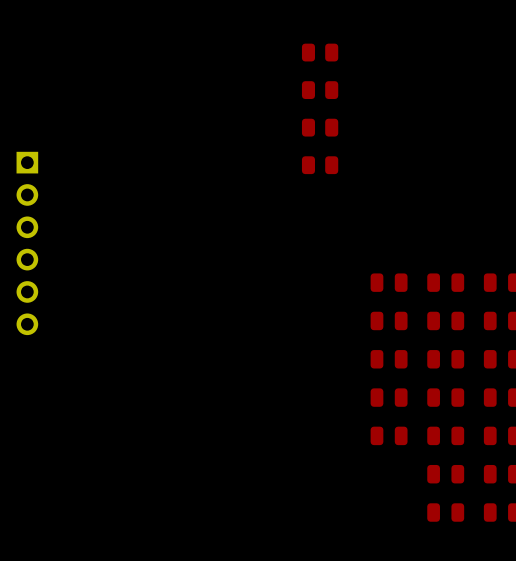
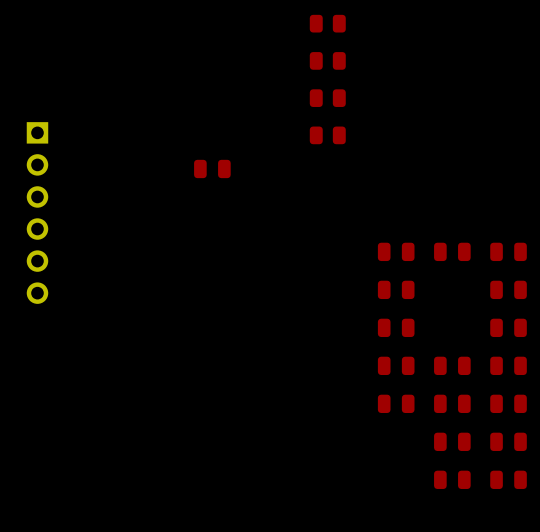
part: none -> (212, 168)
part: (445, 320) -> none
part: (445, 359) -> none

